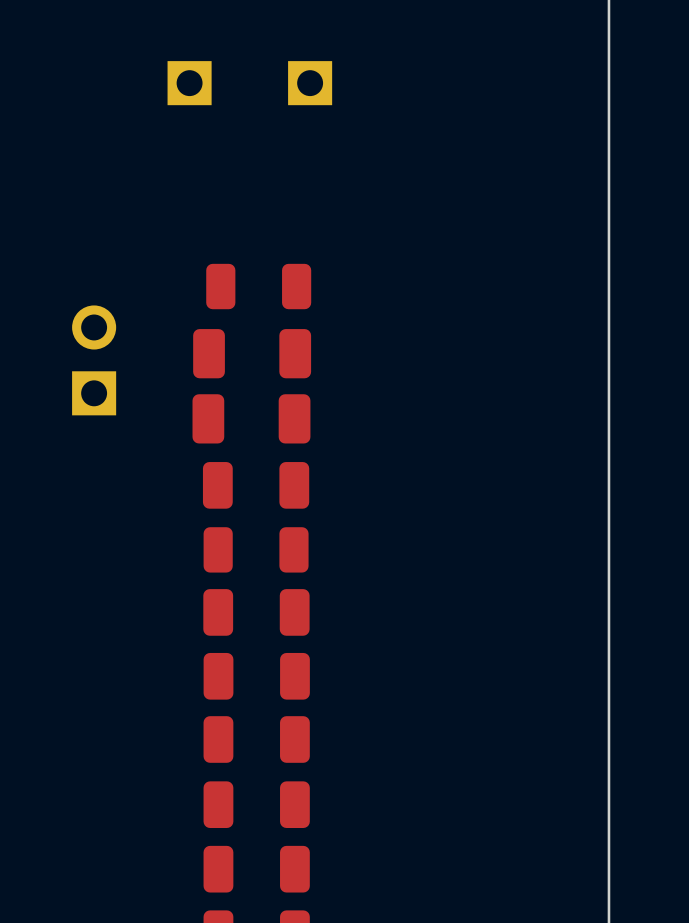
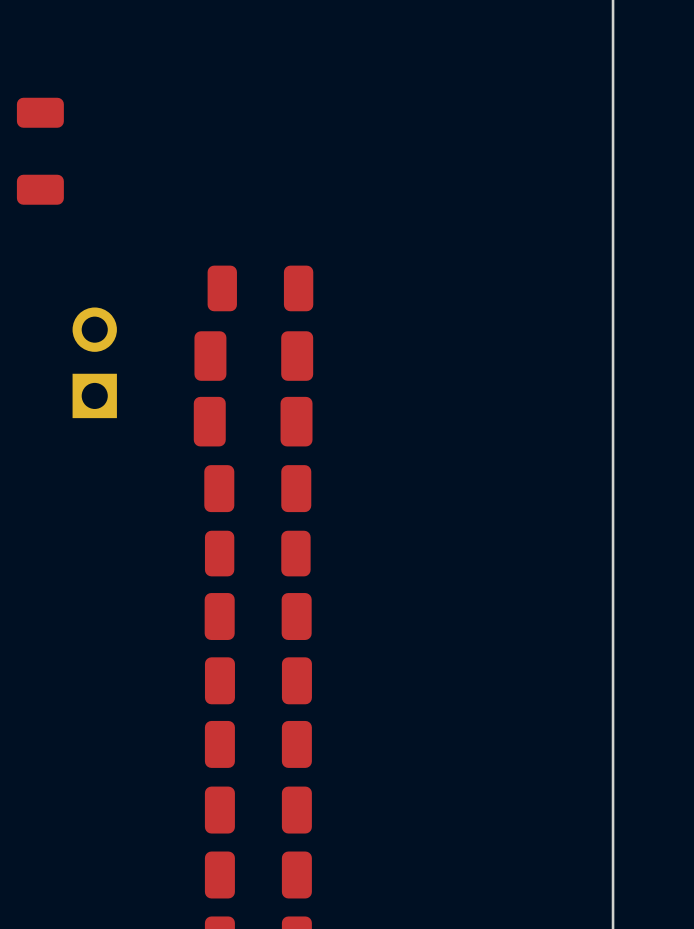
part: (189, 83) -> none
part: (310, 83) -> none
part: none -> (40, 151)

